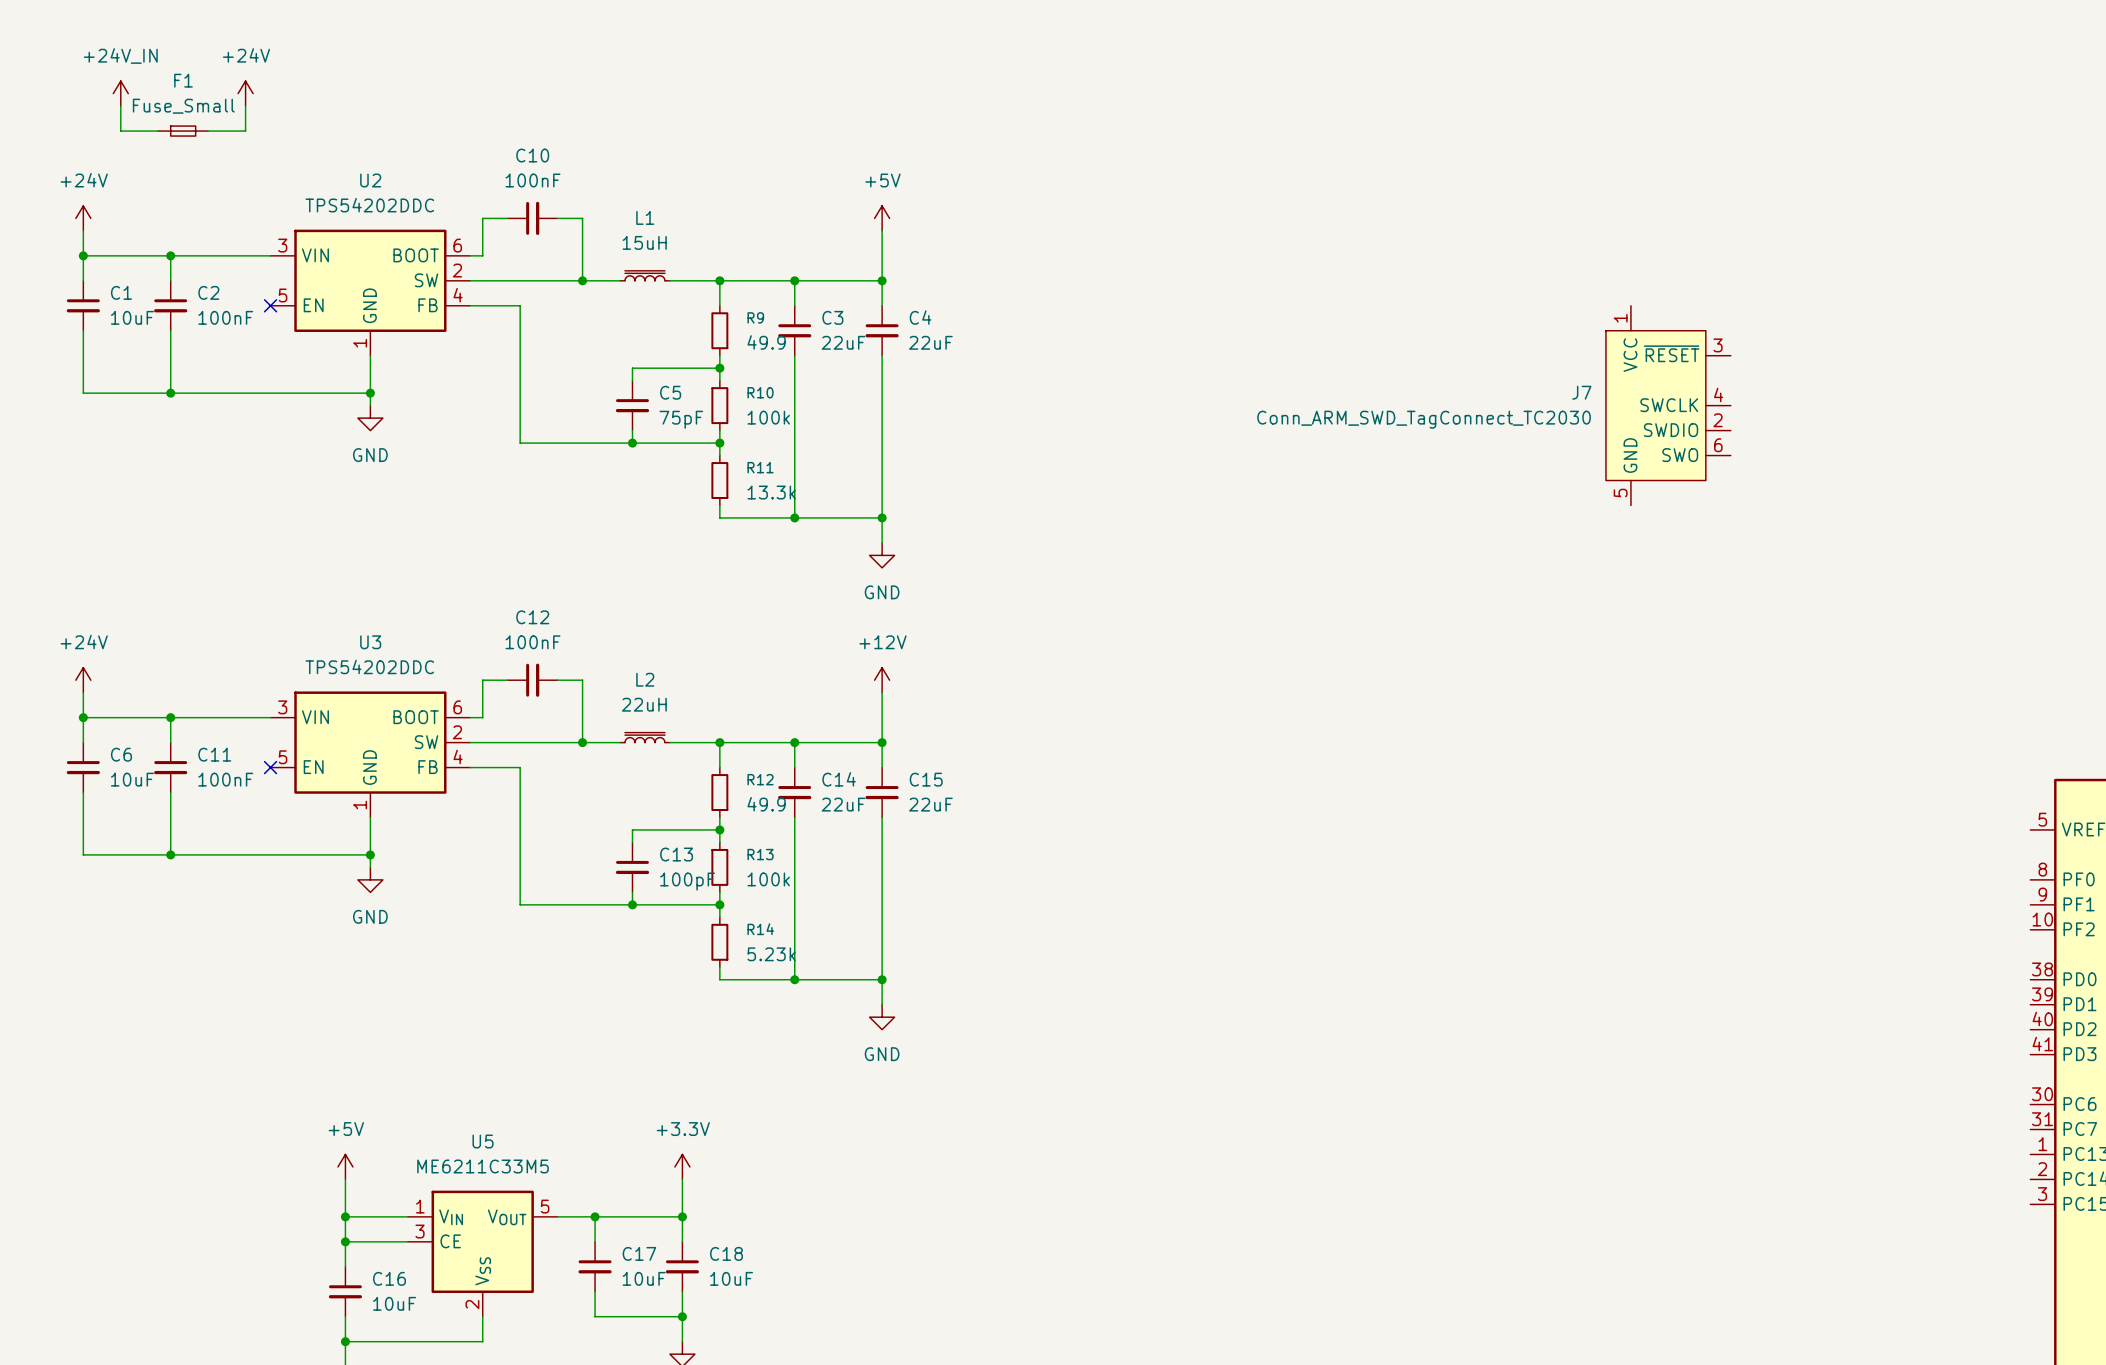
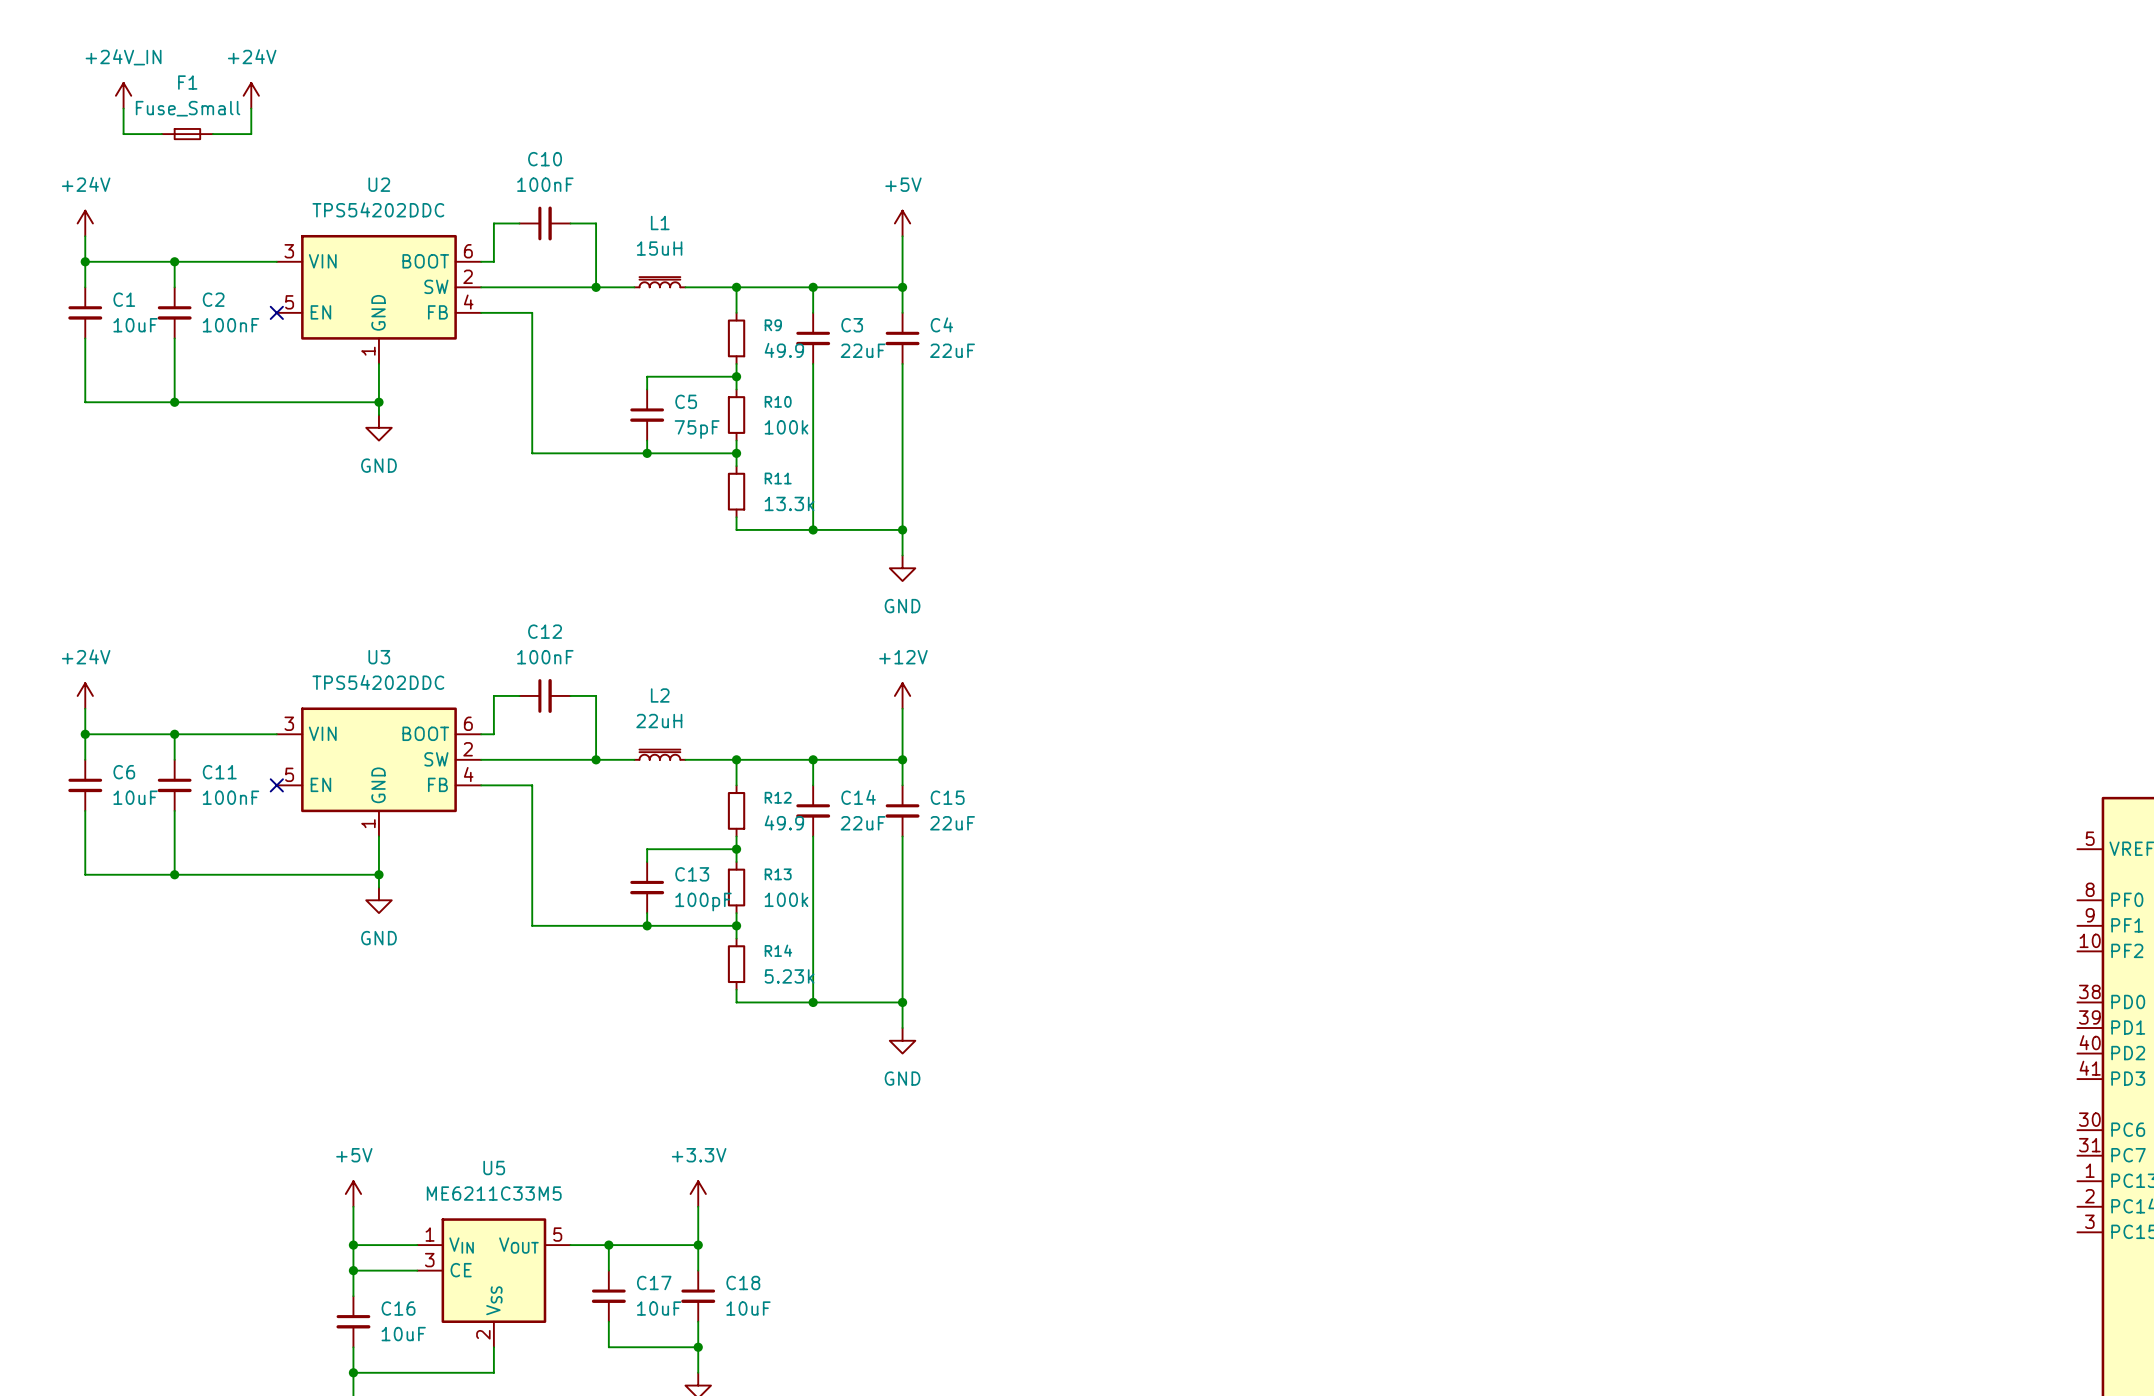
J7: Conn_ARM_SWD_TagConnect_TC2030 (1668, 405) -> none

